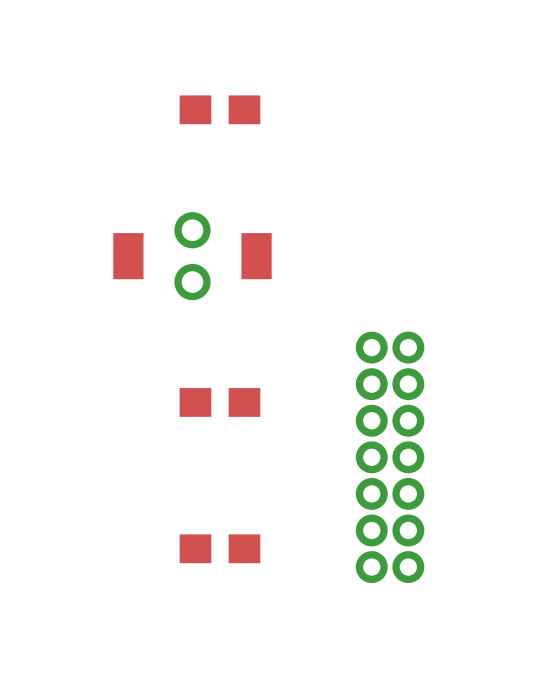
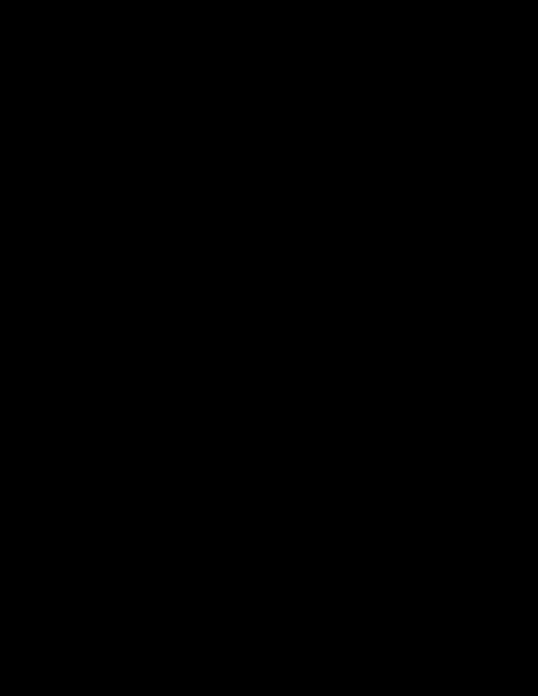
part: (219, 109) -> none
part: (192, 256) -> none
part: (219, 402) -> none
part: (390, 457) -> none
part: (219, 548) -> none

